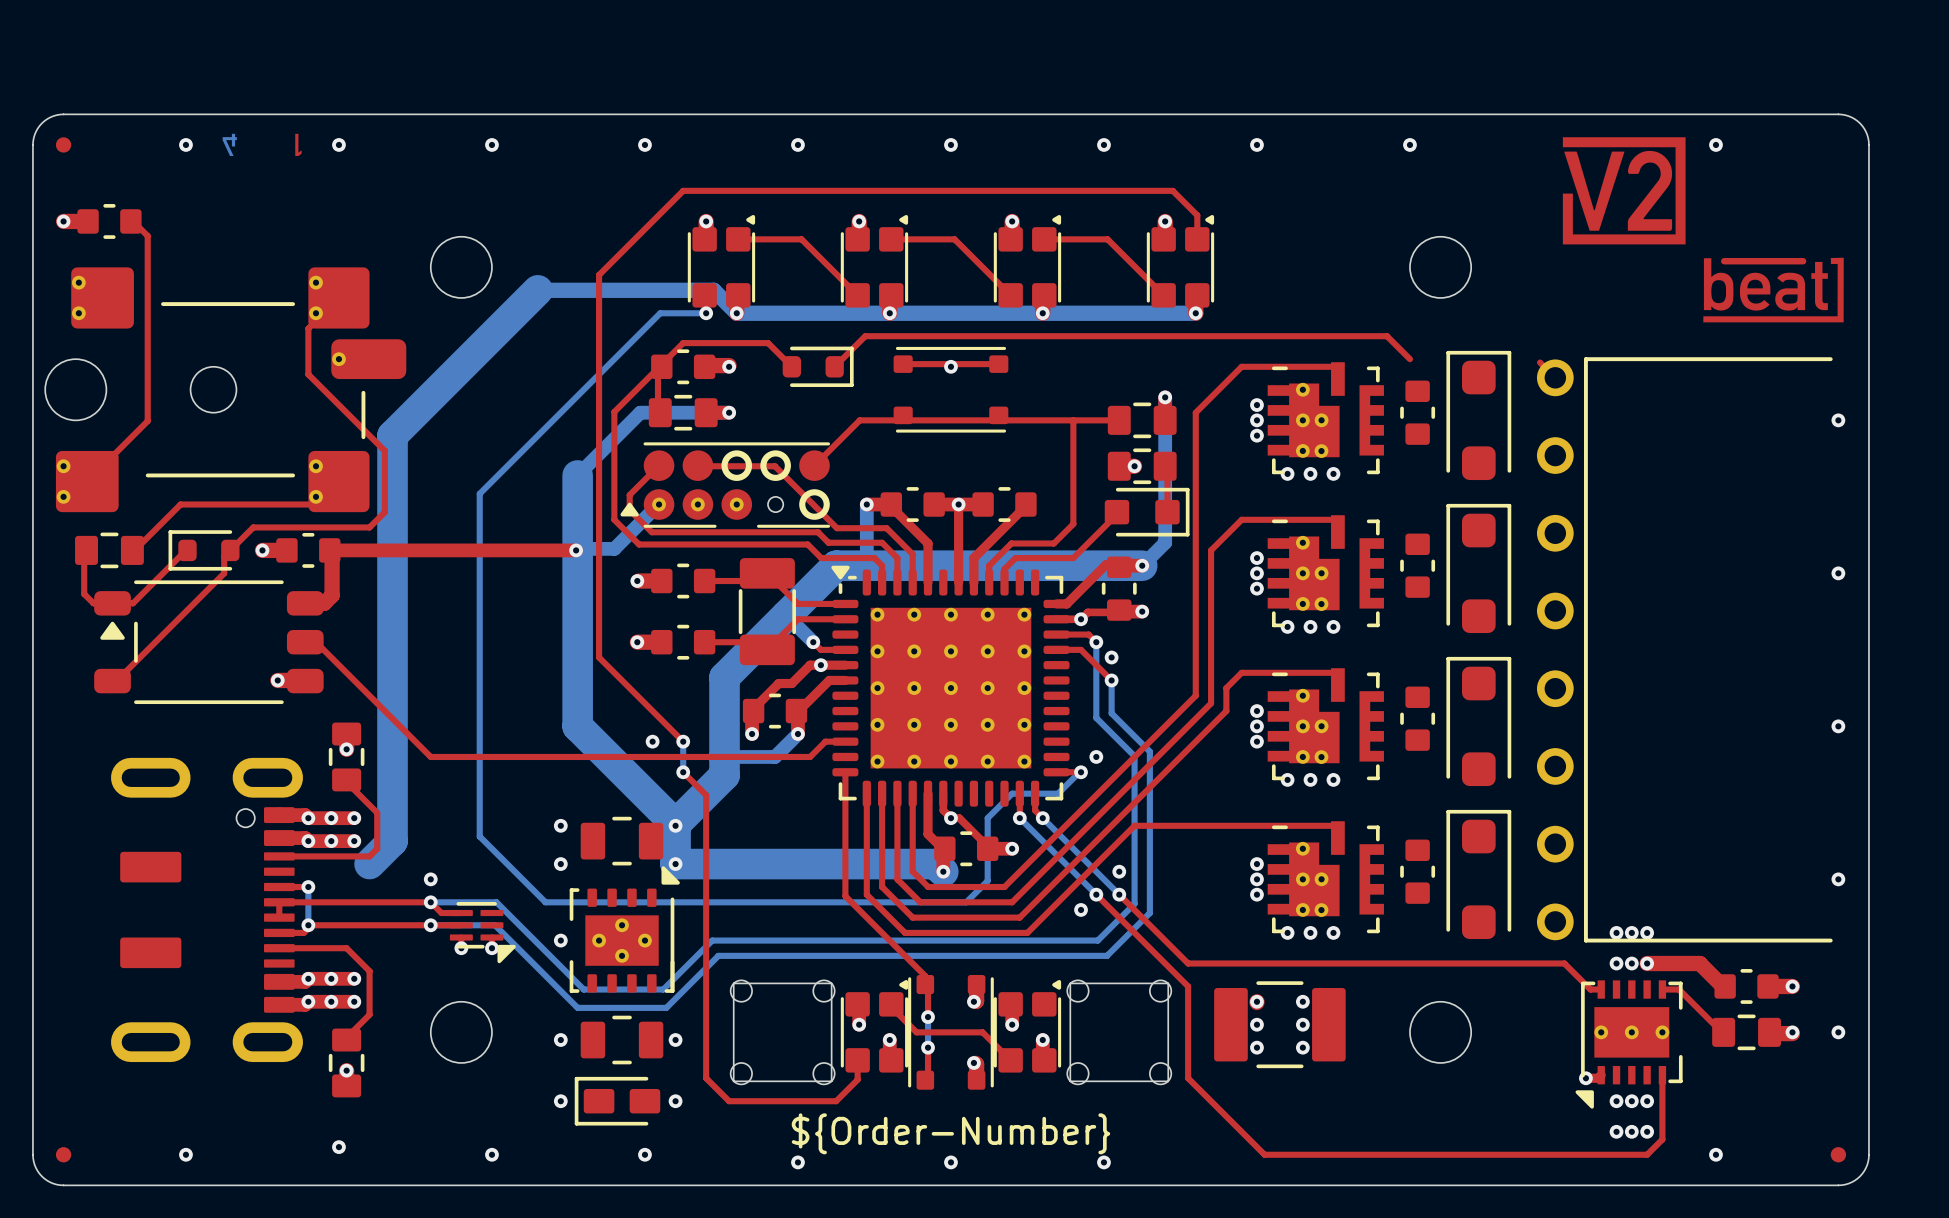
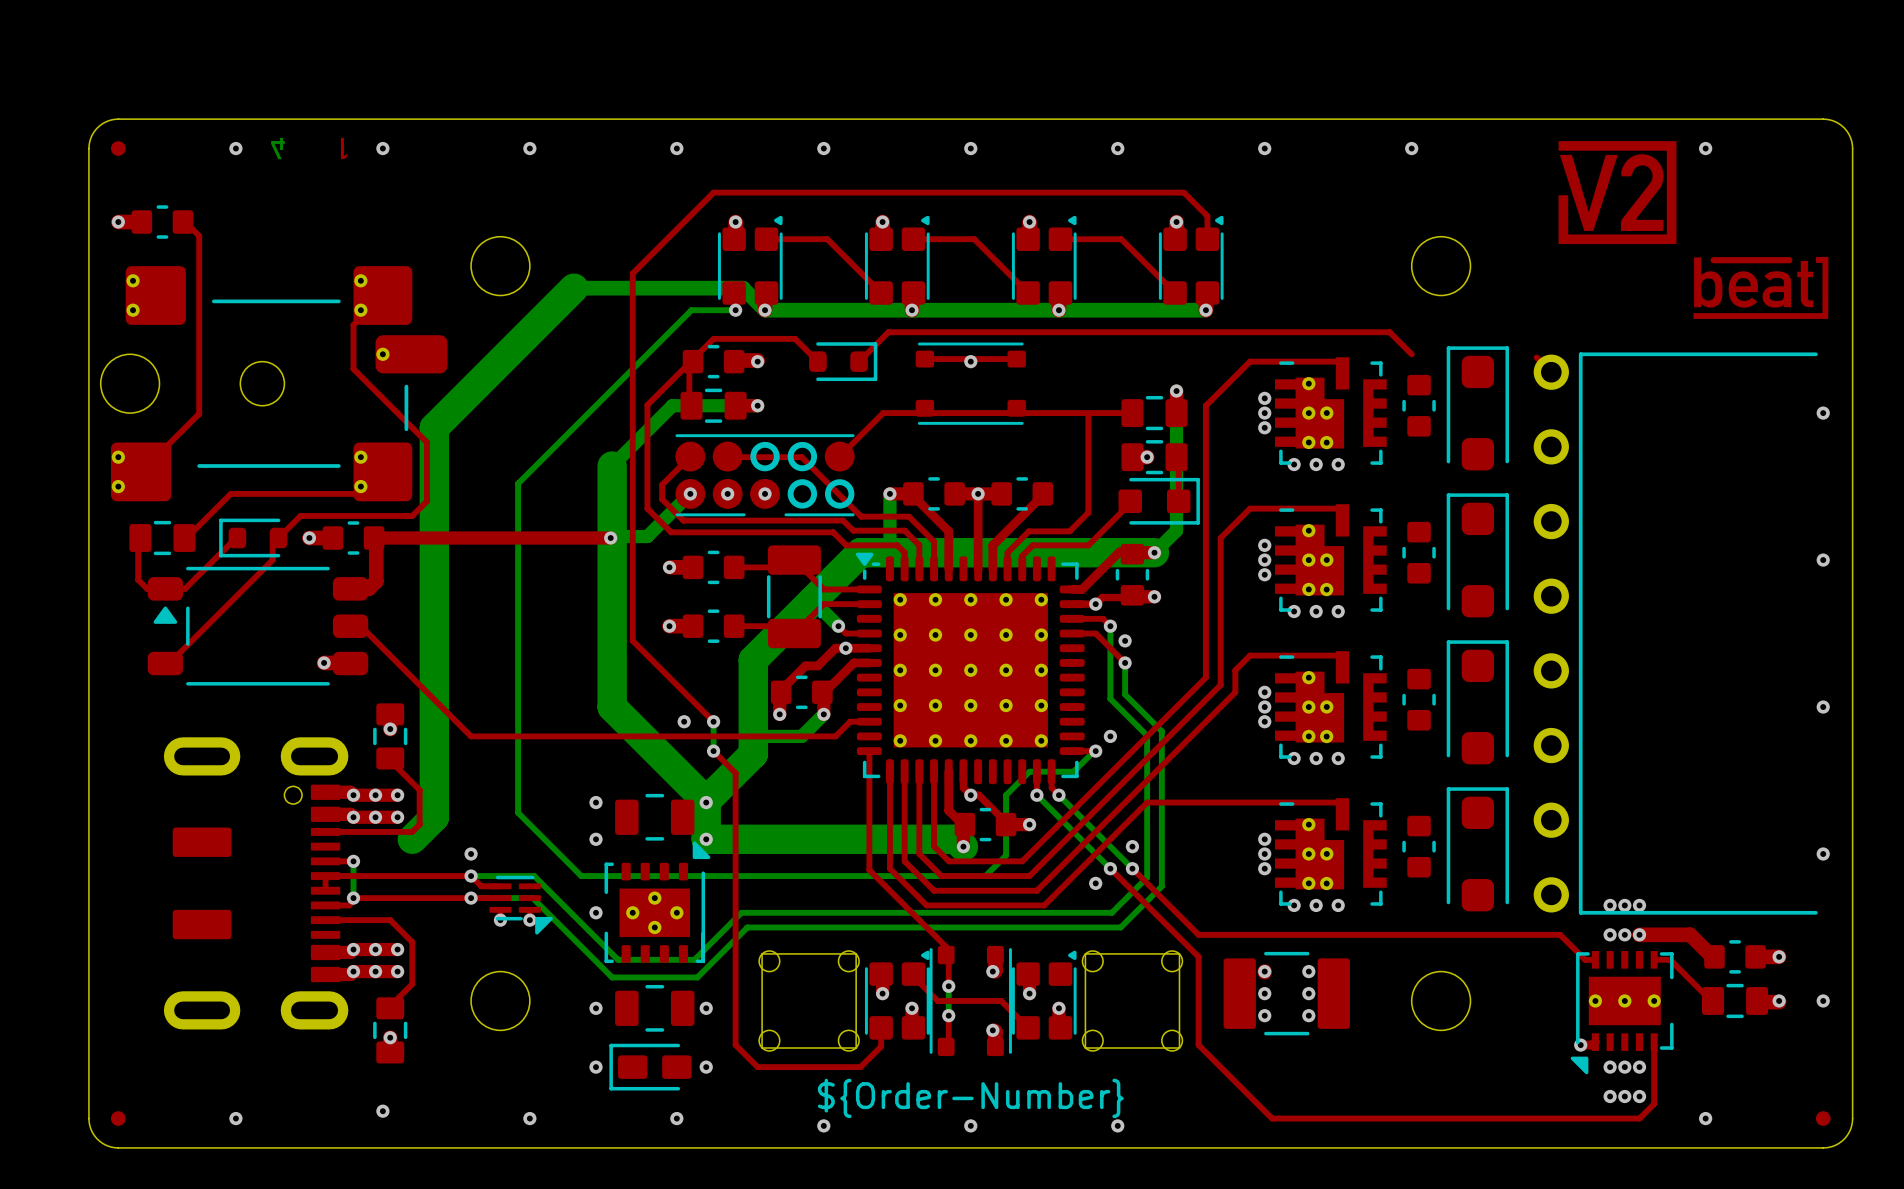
part footprint: [620, 442, 831, 528] -> [675, 434, 855, 517]
via: none -> (690, 493)
via: none -> (727, 493)
via: none -> (765, 493)

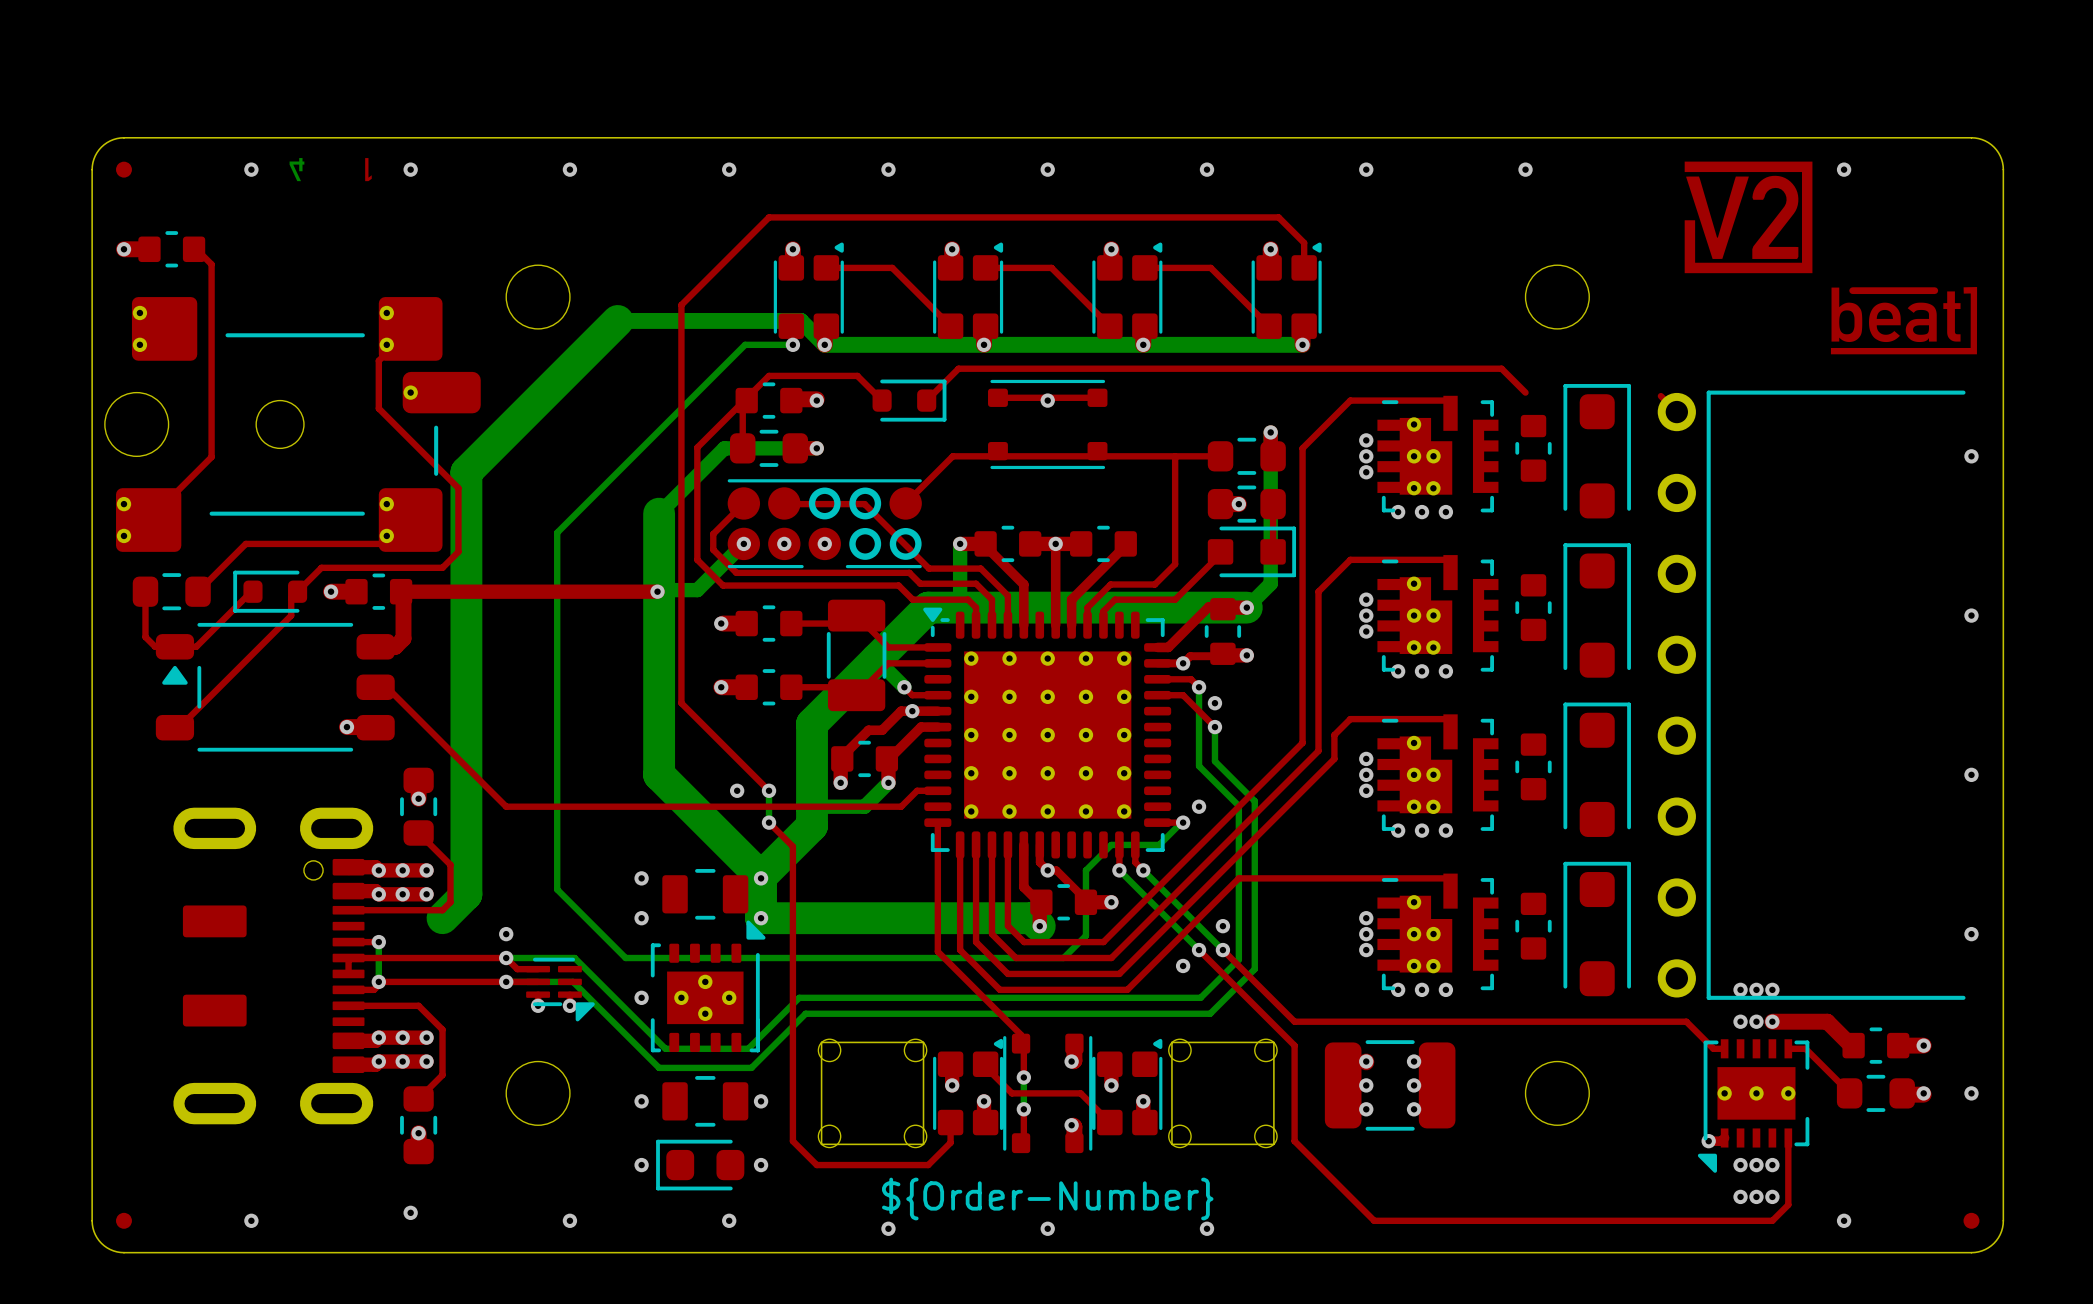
part footprint: [680, 388, 747, 423] -> [729, 429, 809, 467]
part footprint: [1121, 395, 1188, 431] -> [1207, 437, 1286, 475]
part footprint: [1121, 440, 1188, 475] -> [1207, 485, 1286, 523]
part footprint: [129, 520, 196, 556] -> [132, 573, 211, 611]
part footprint: [373, 703, 408, 770] -> [400, 767, 438, 846]
part footprint: [1223, 951, 1350, 1036] -> [1324, 1040, 1456, 1131]
part footprint: [1701, 983, 1769, 1019] -> [1836, 1074, 1915, 1112]
part footprint: [373, 997, 408, 1064] -> [400, 1086, 438, 1165]
part footprint: [609, 1043, 692, 1091] -> [656, 1139, 745, 1191]

